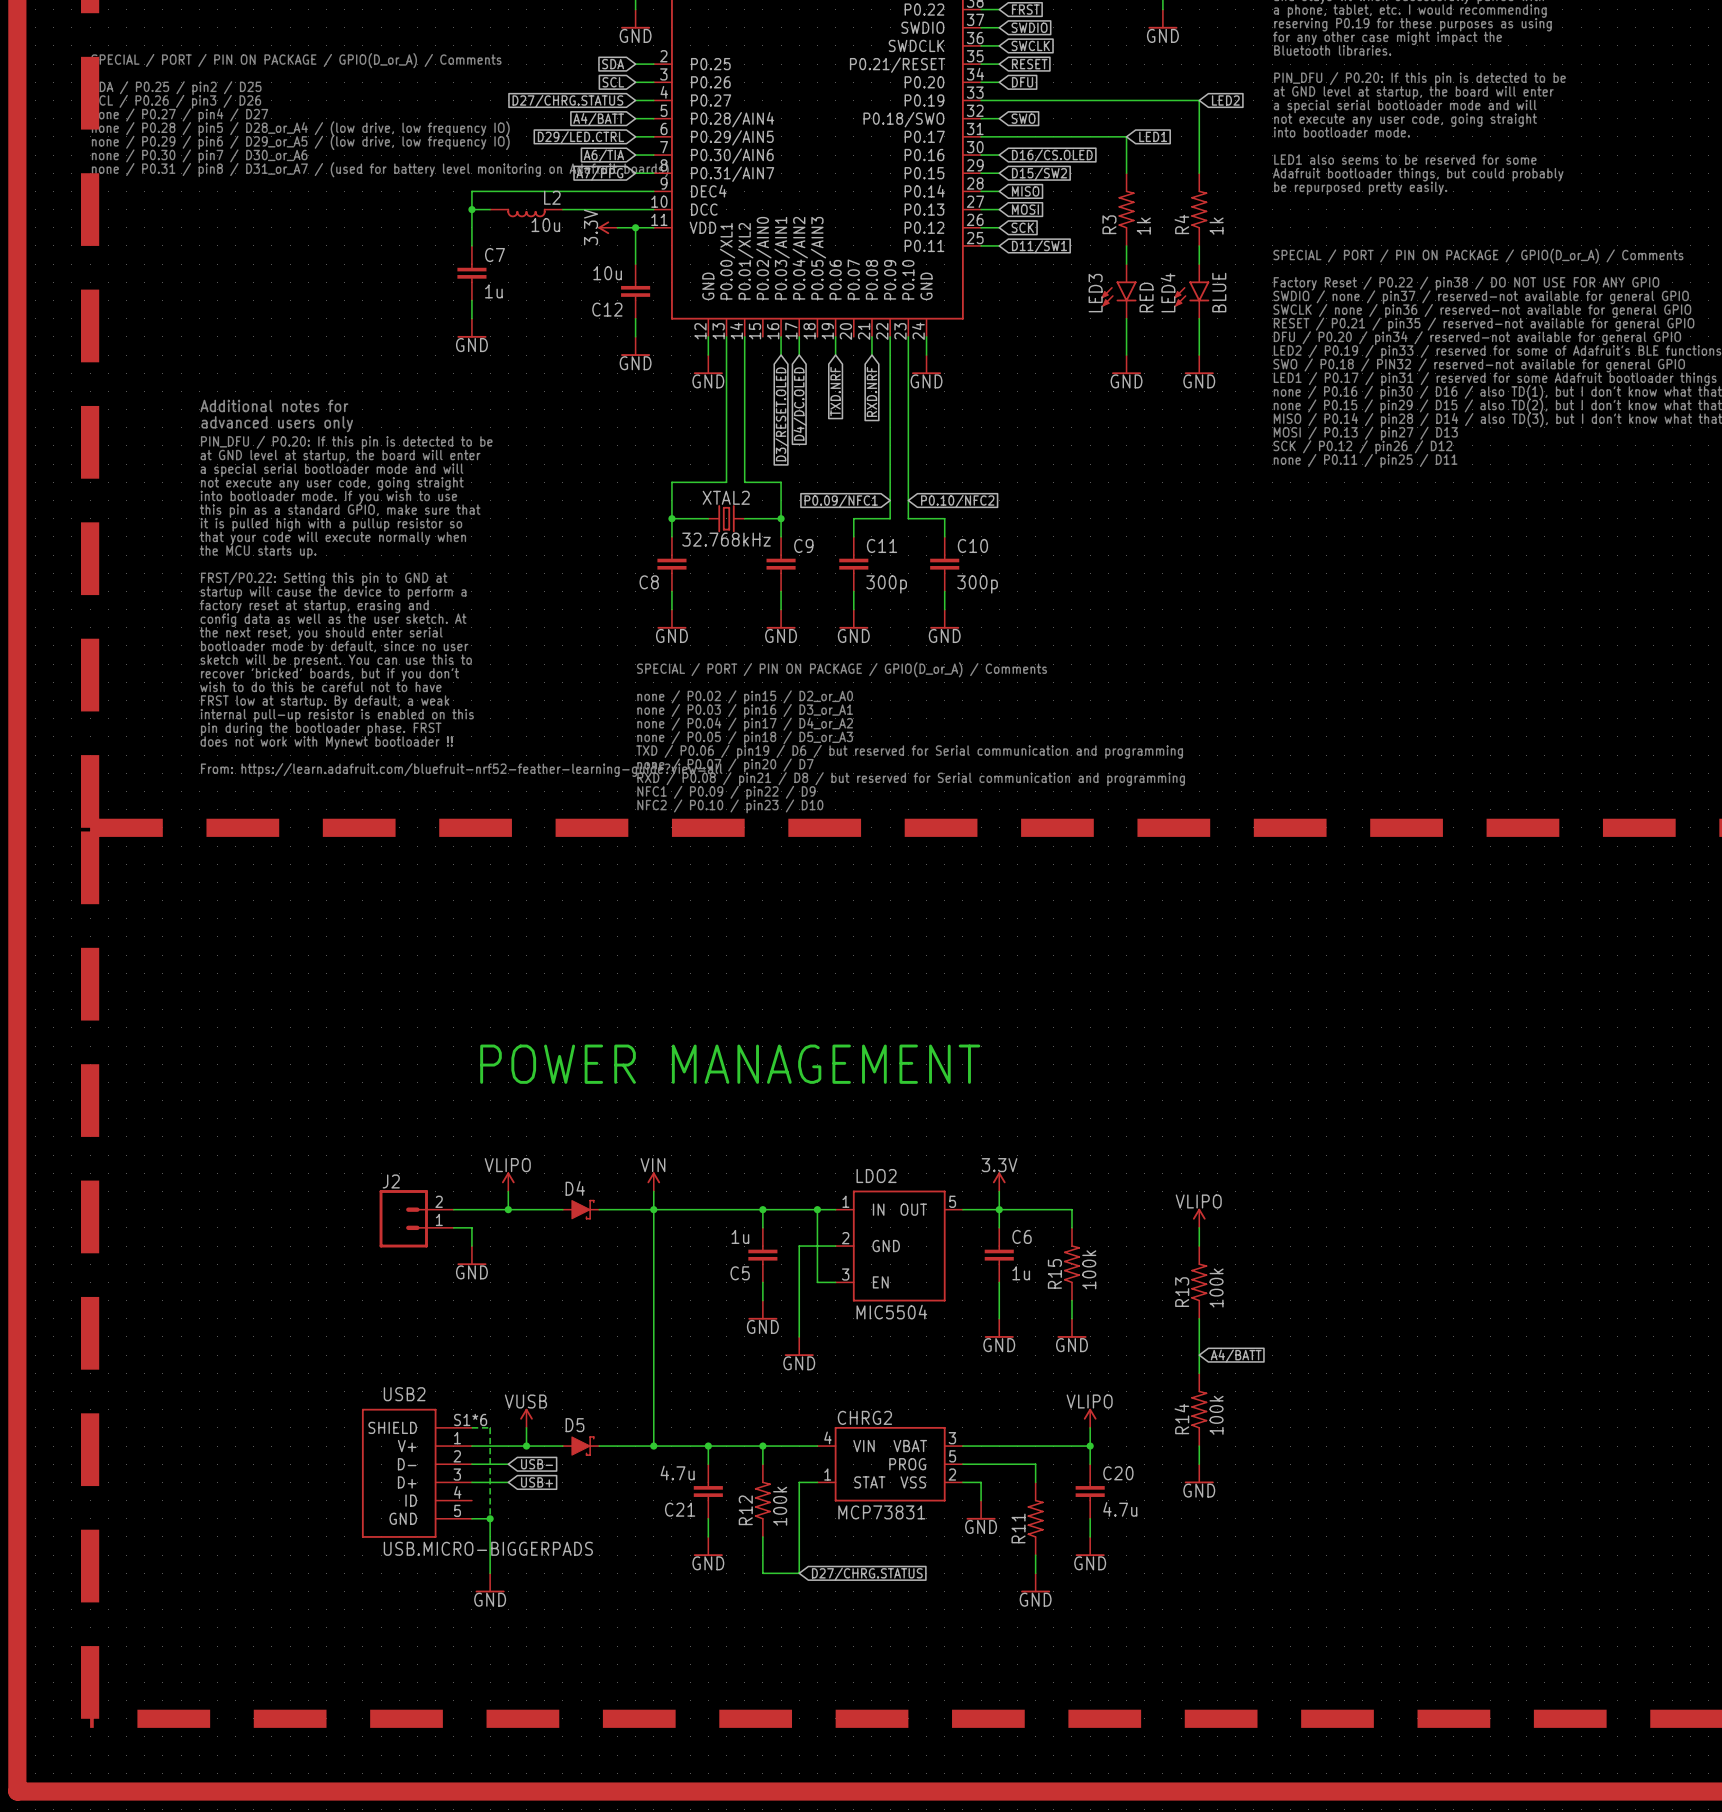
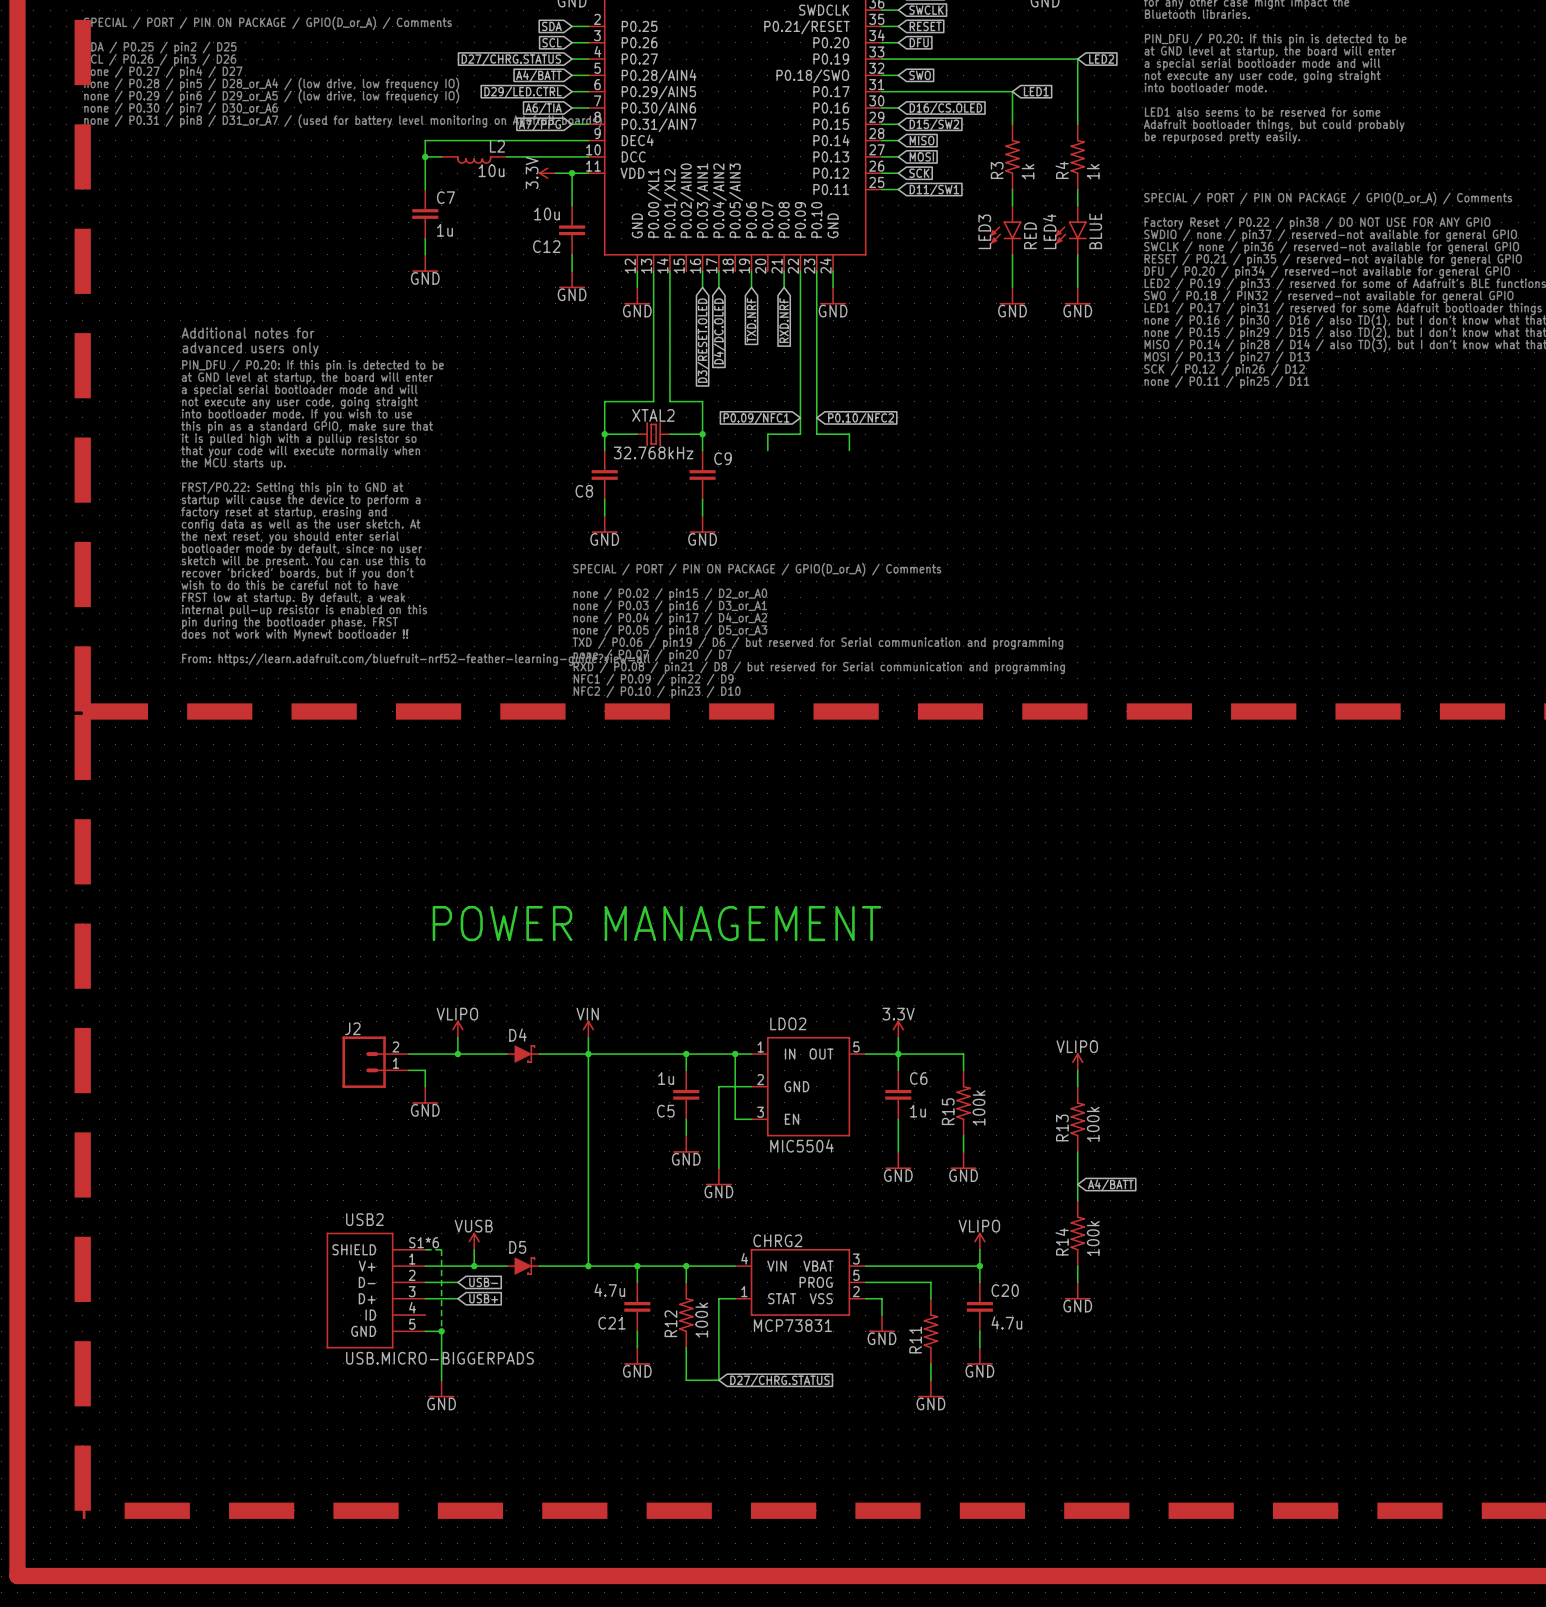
C11: 300p (853, 564) -> none
C10: 300p (944, 564) -> none
wire: (853, 591) (853, 609) -> none
wire: (944, 591) (944, 609) -> none
power symbol: GND (853, 619) -> none
power symbol: GND (944, 619) -> none

